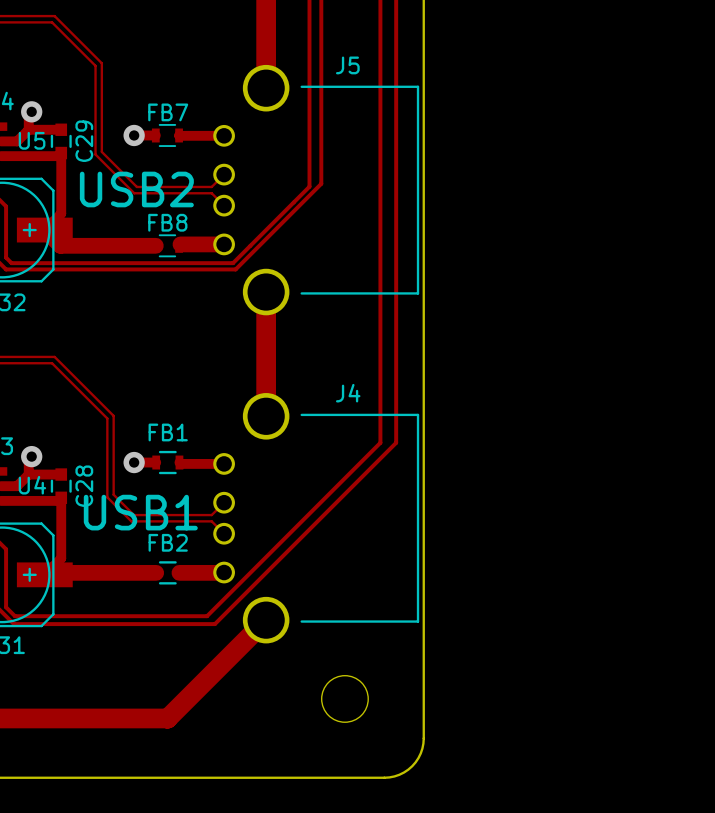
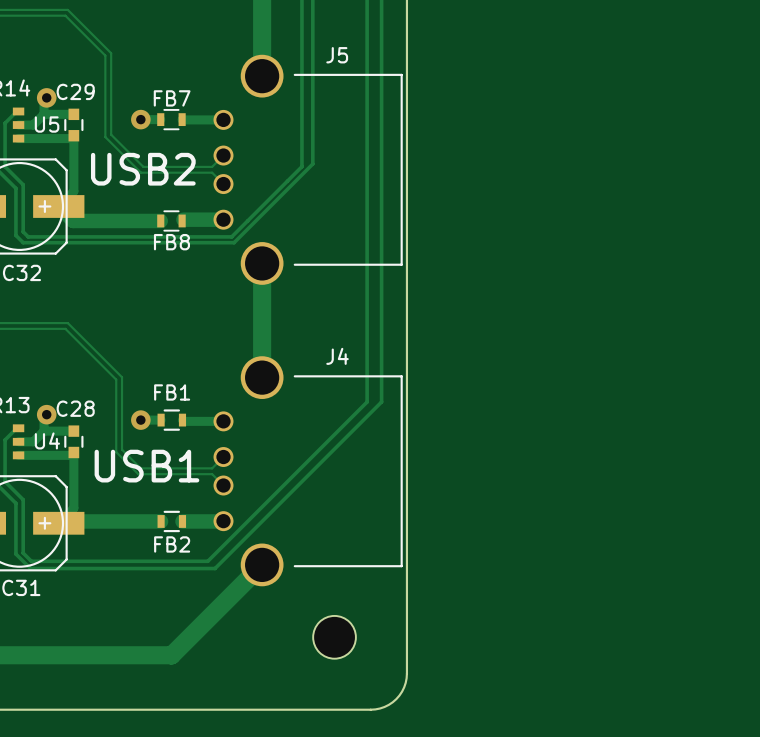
C29 name rotation: 0° (84, 141) -> 90° clockwise (75, 91)
FB8 name position: FB8 (167, 222) -> FB8 (171, 242)
C28 name rotation: 0° (84, 486) -> 90° clockwise (75, 408)
FB2 name position: FB2 (168, 542) -> FB2 (172, 544)

